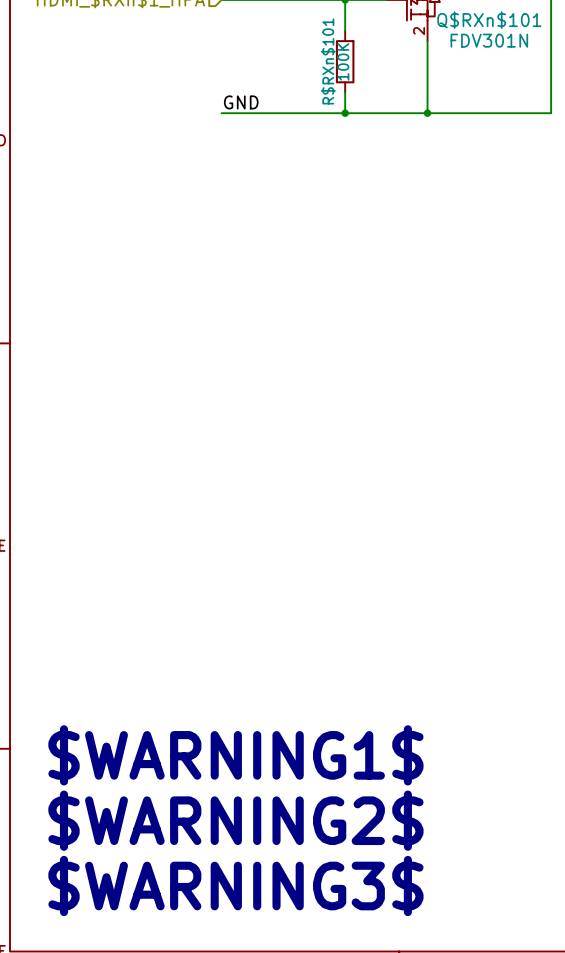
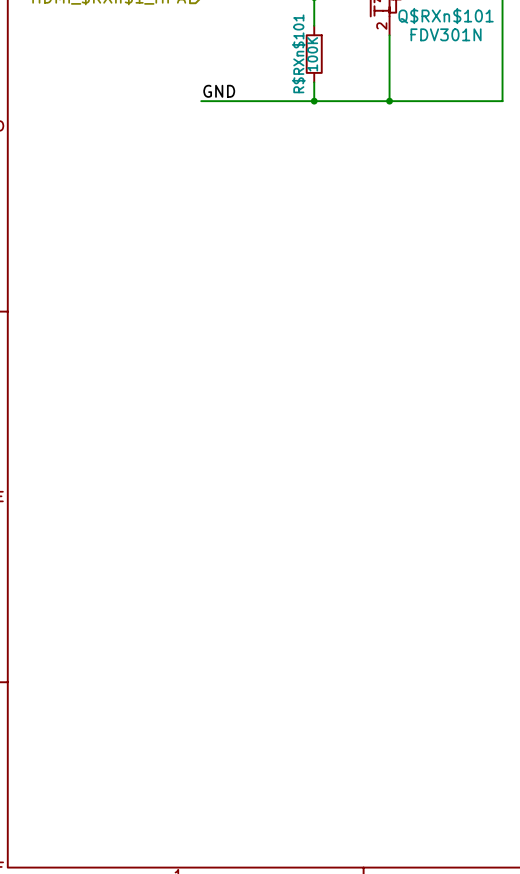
text: $WARNING1$ (235, 755) -> none
text: $WARNING2$ (235, 820) -> none
text: $WARNING3$ (235, 886) -> none

